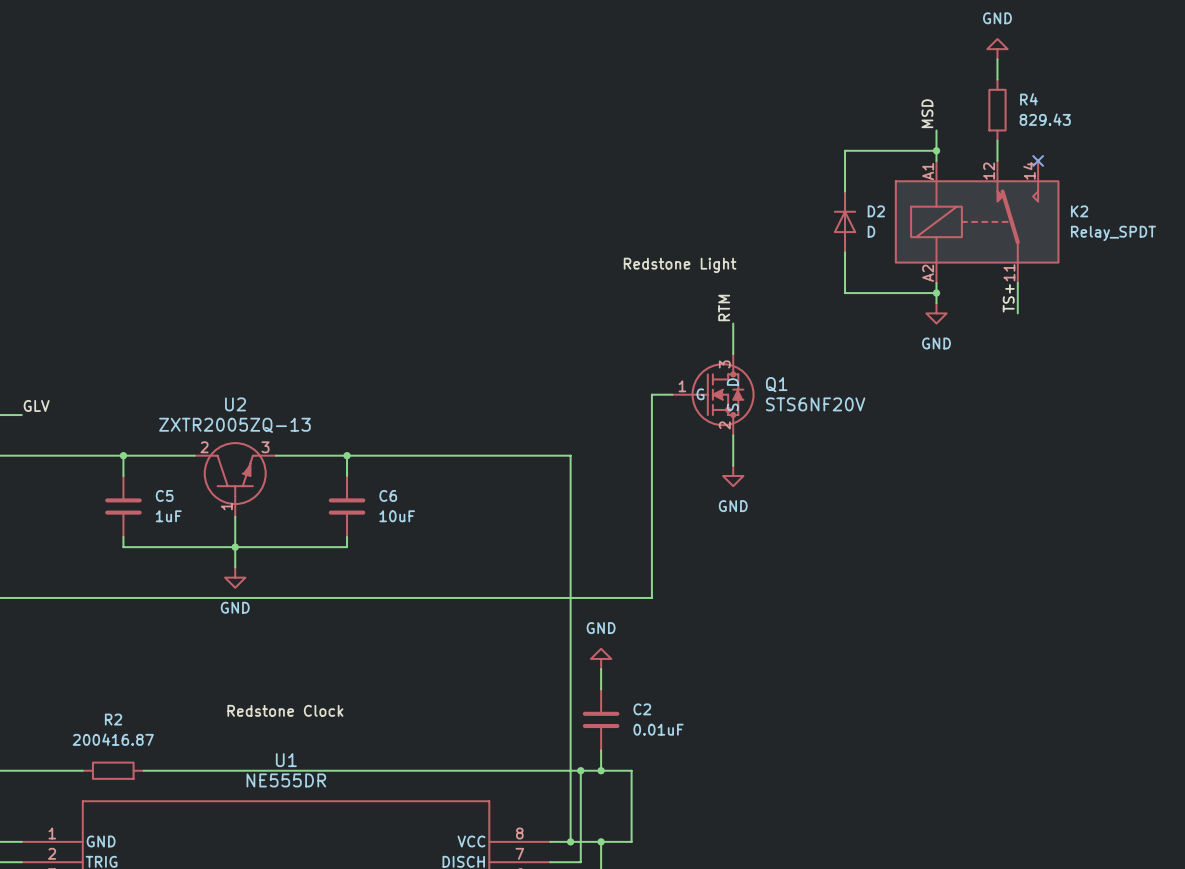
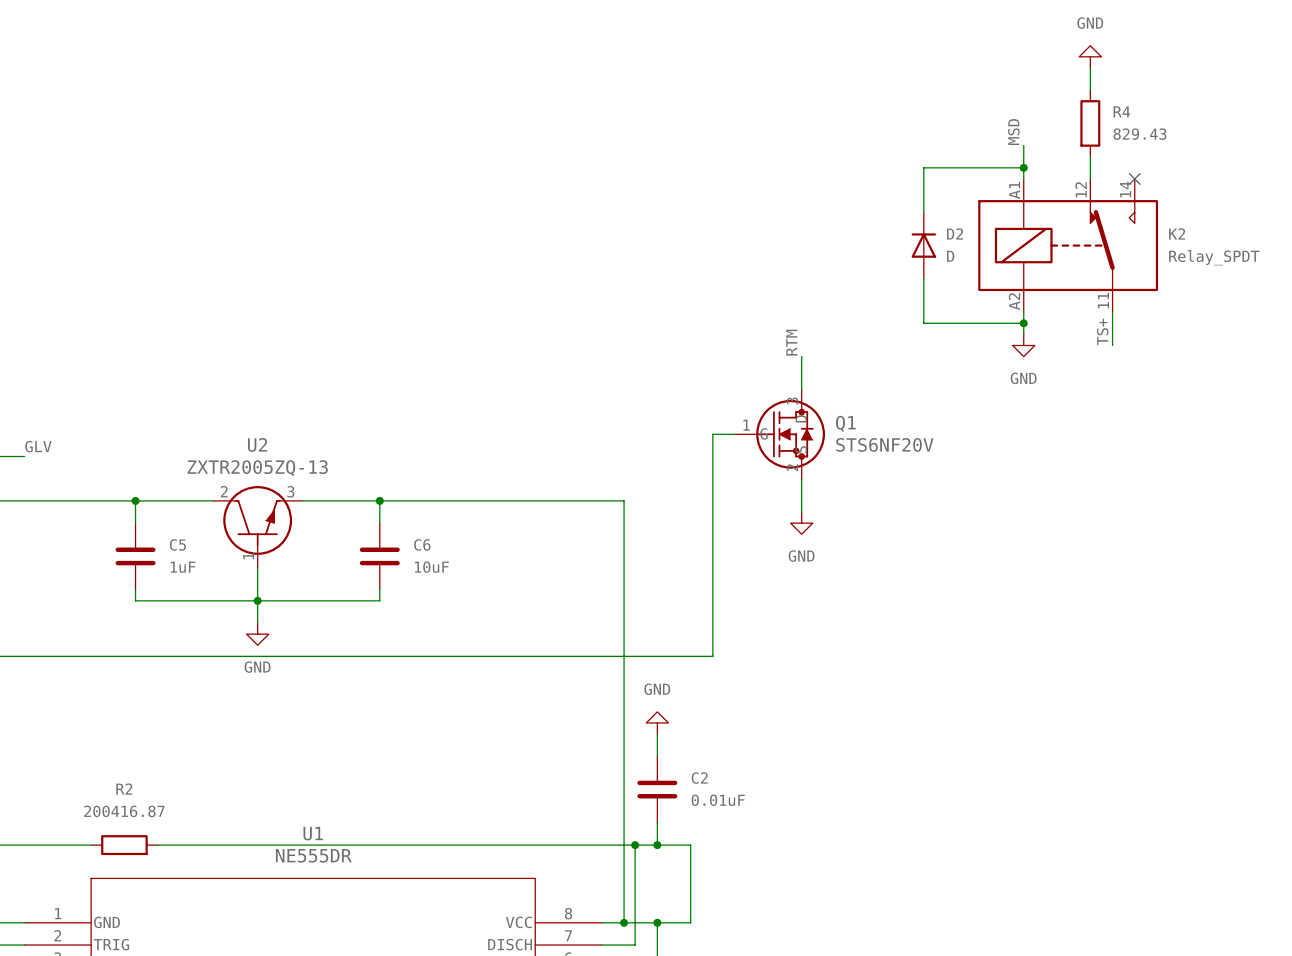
label: Redstone Light (680, 265) -> none
label: Redstone Clock (285, 710) -> none

